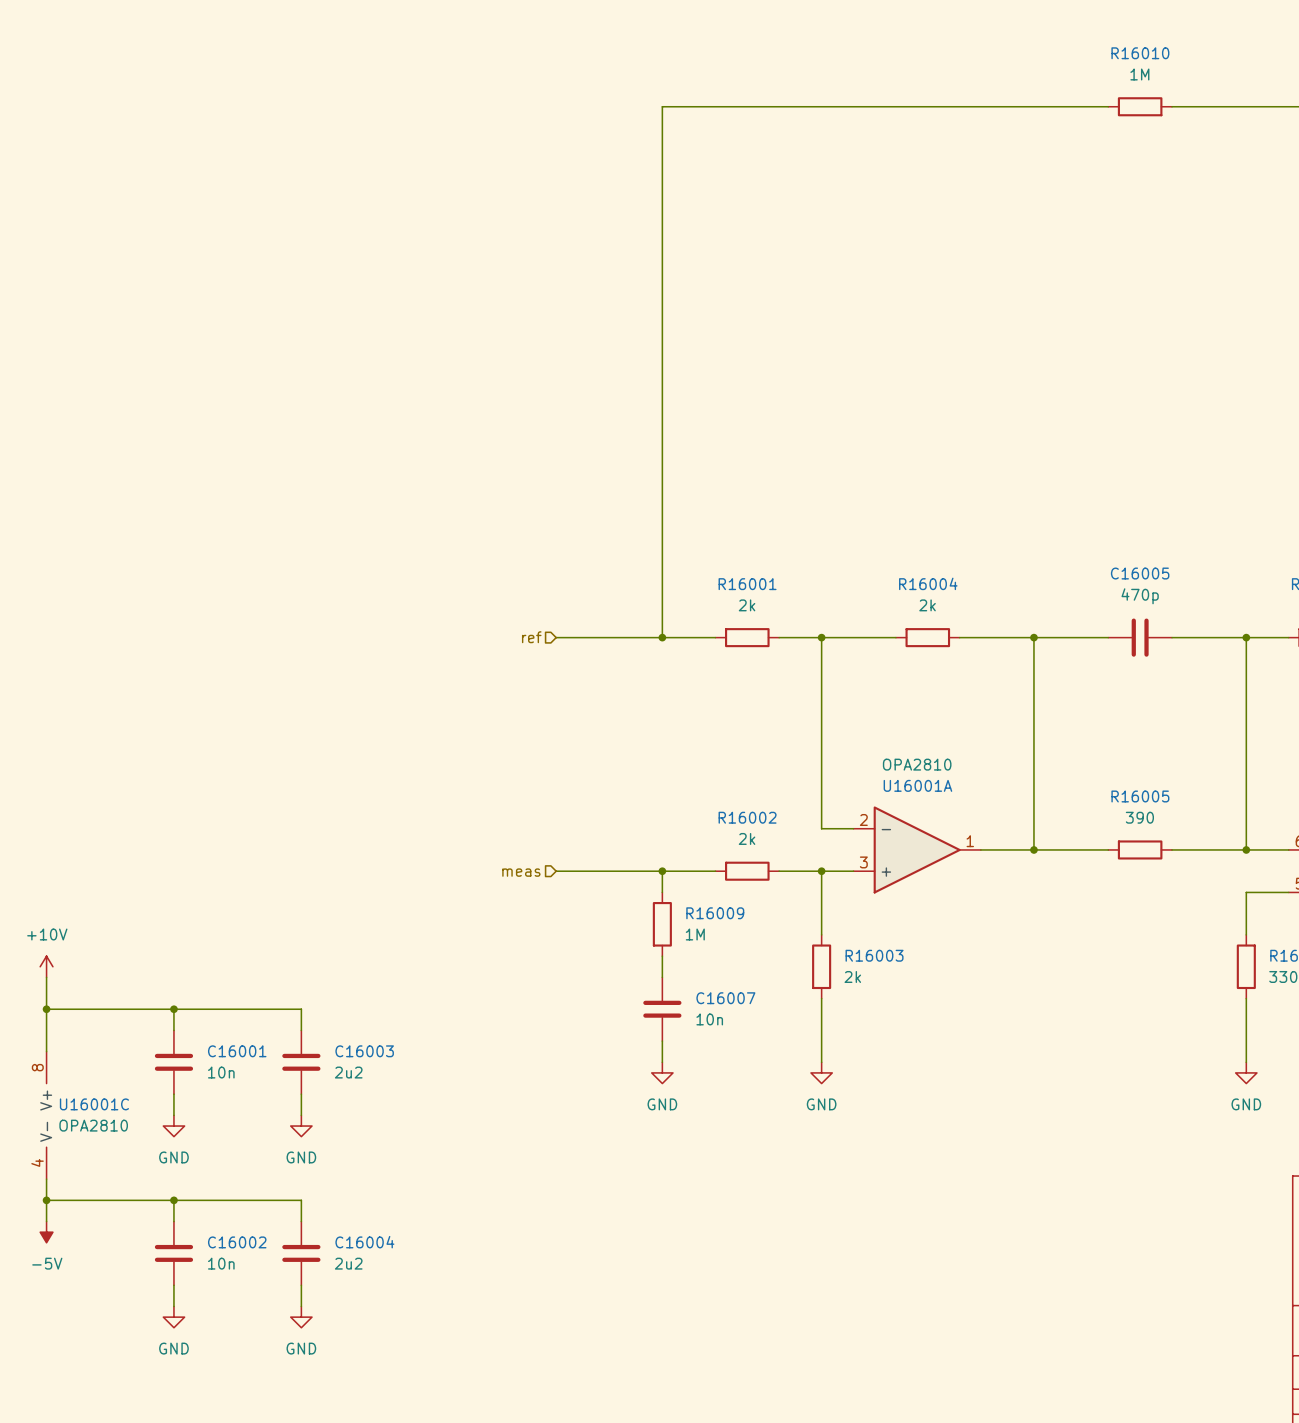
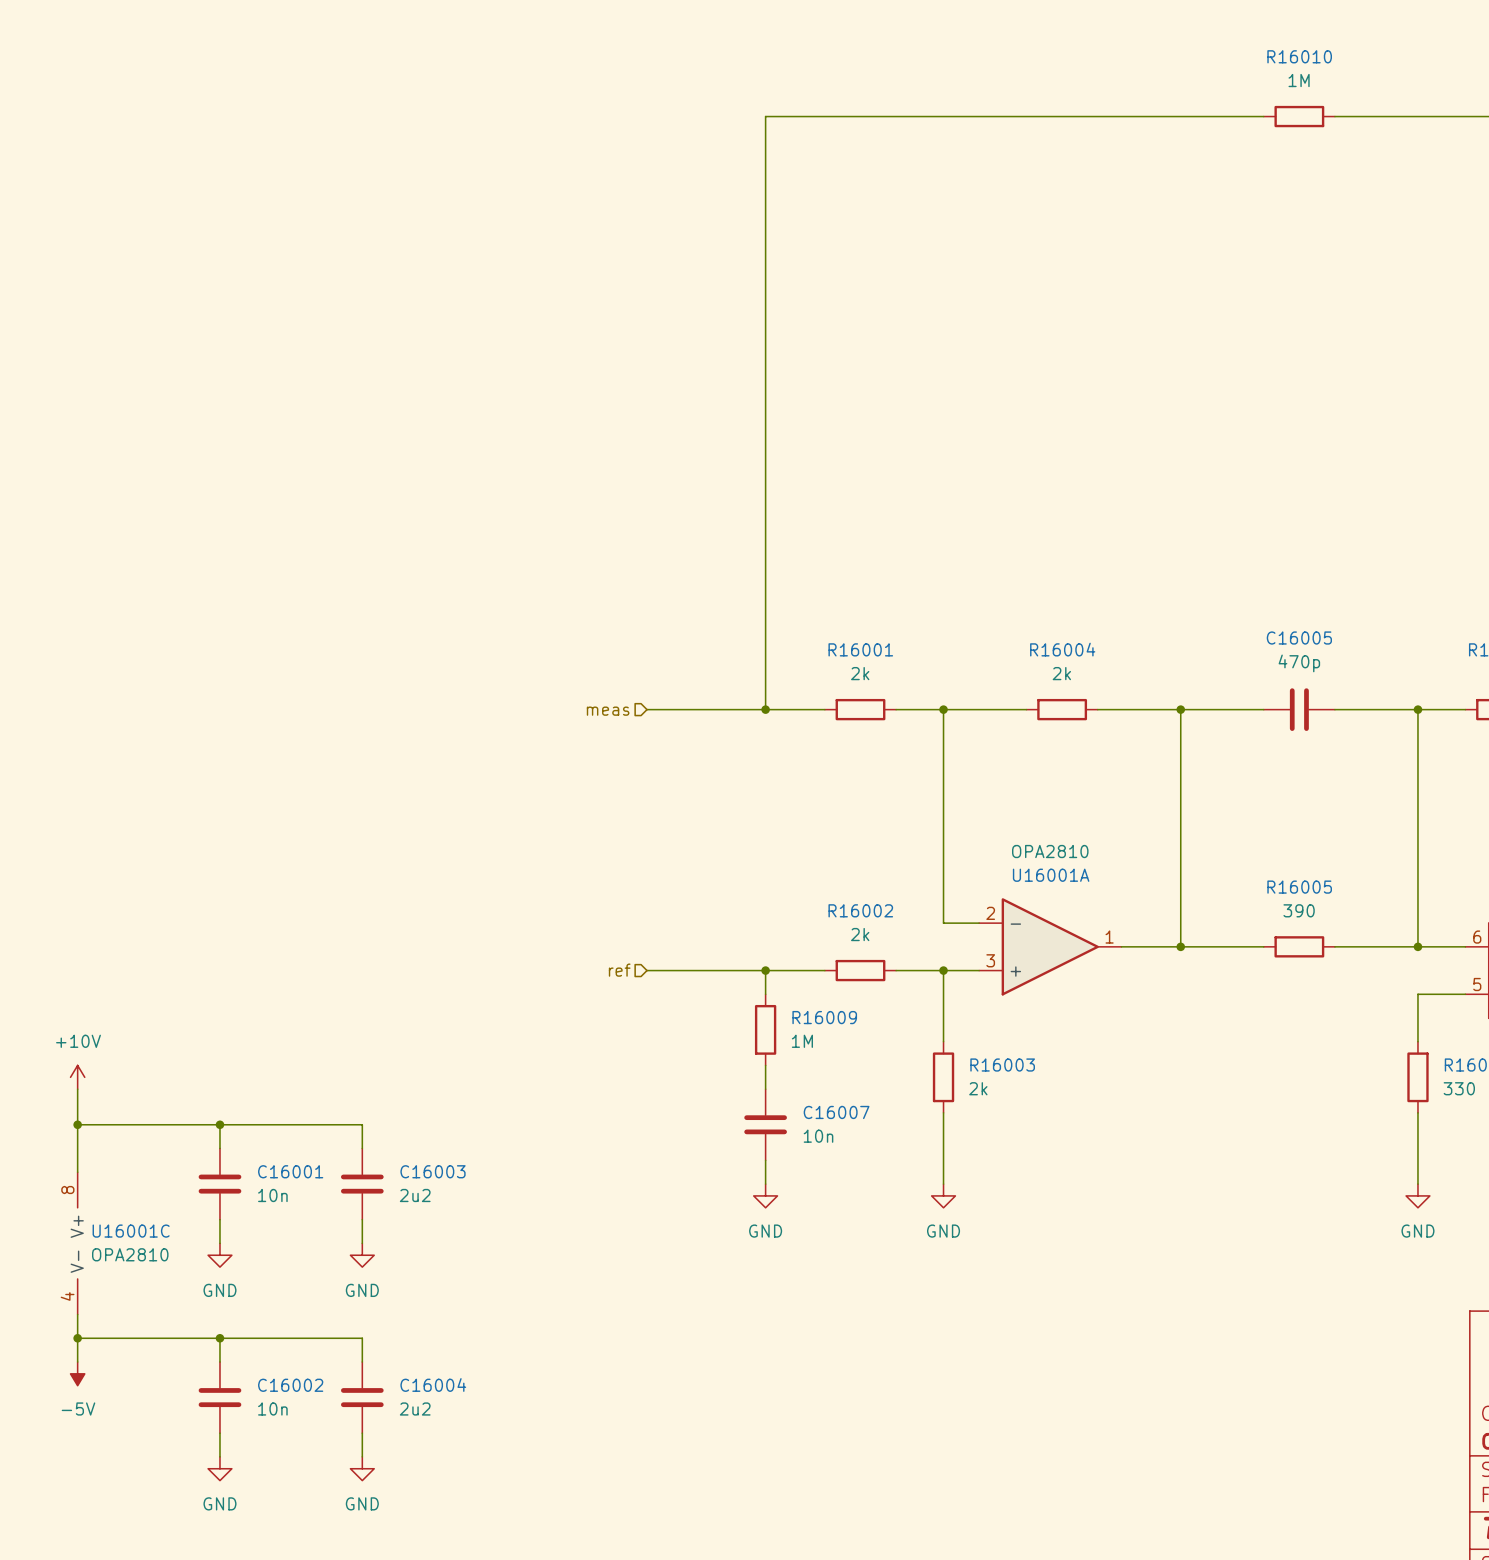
hierarchical label: ref (531, 637) -> meas (608, 711)
hierarchical label: meas (521, 872) -> ref (619, 970)

